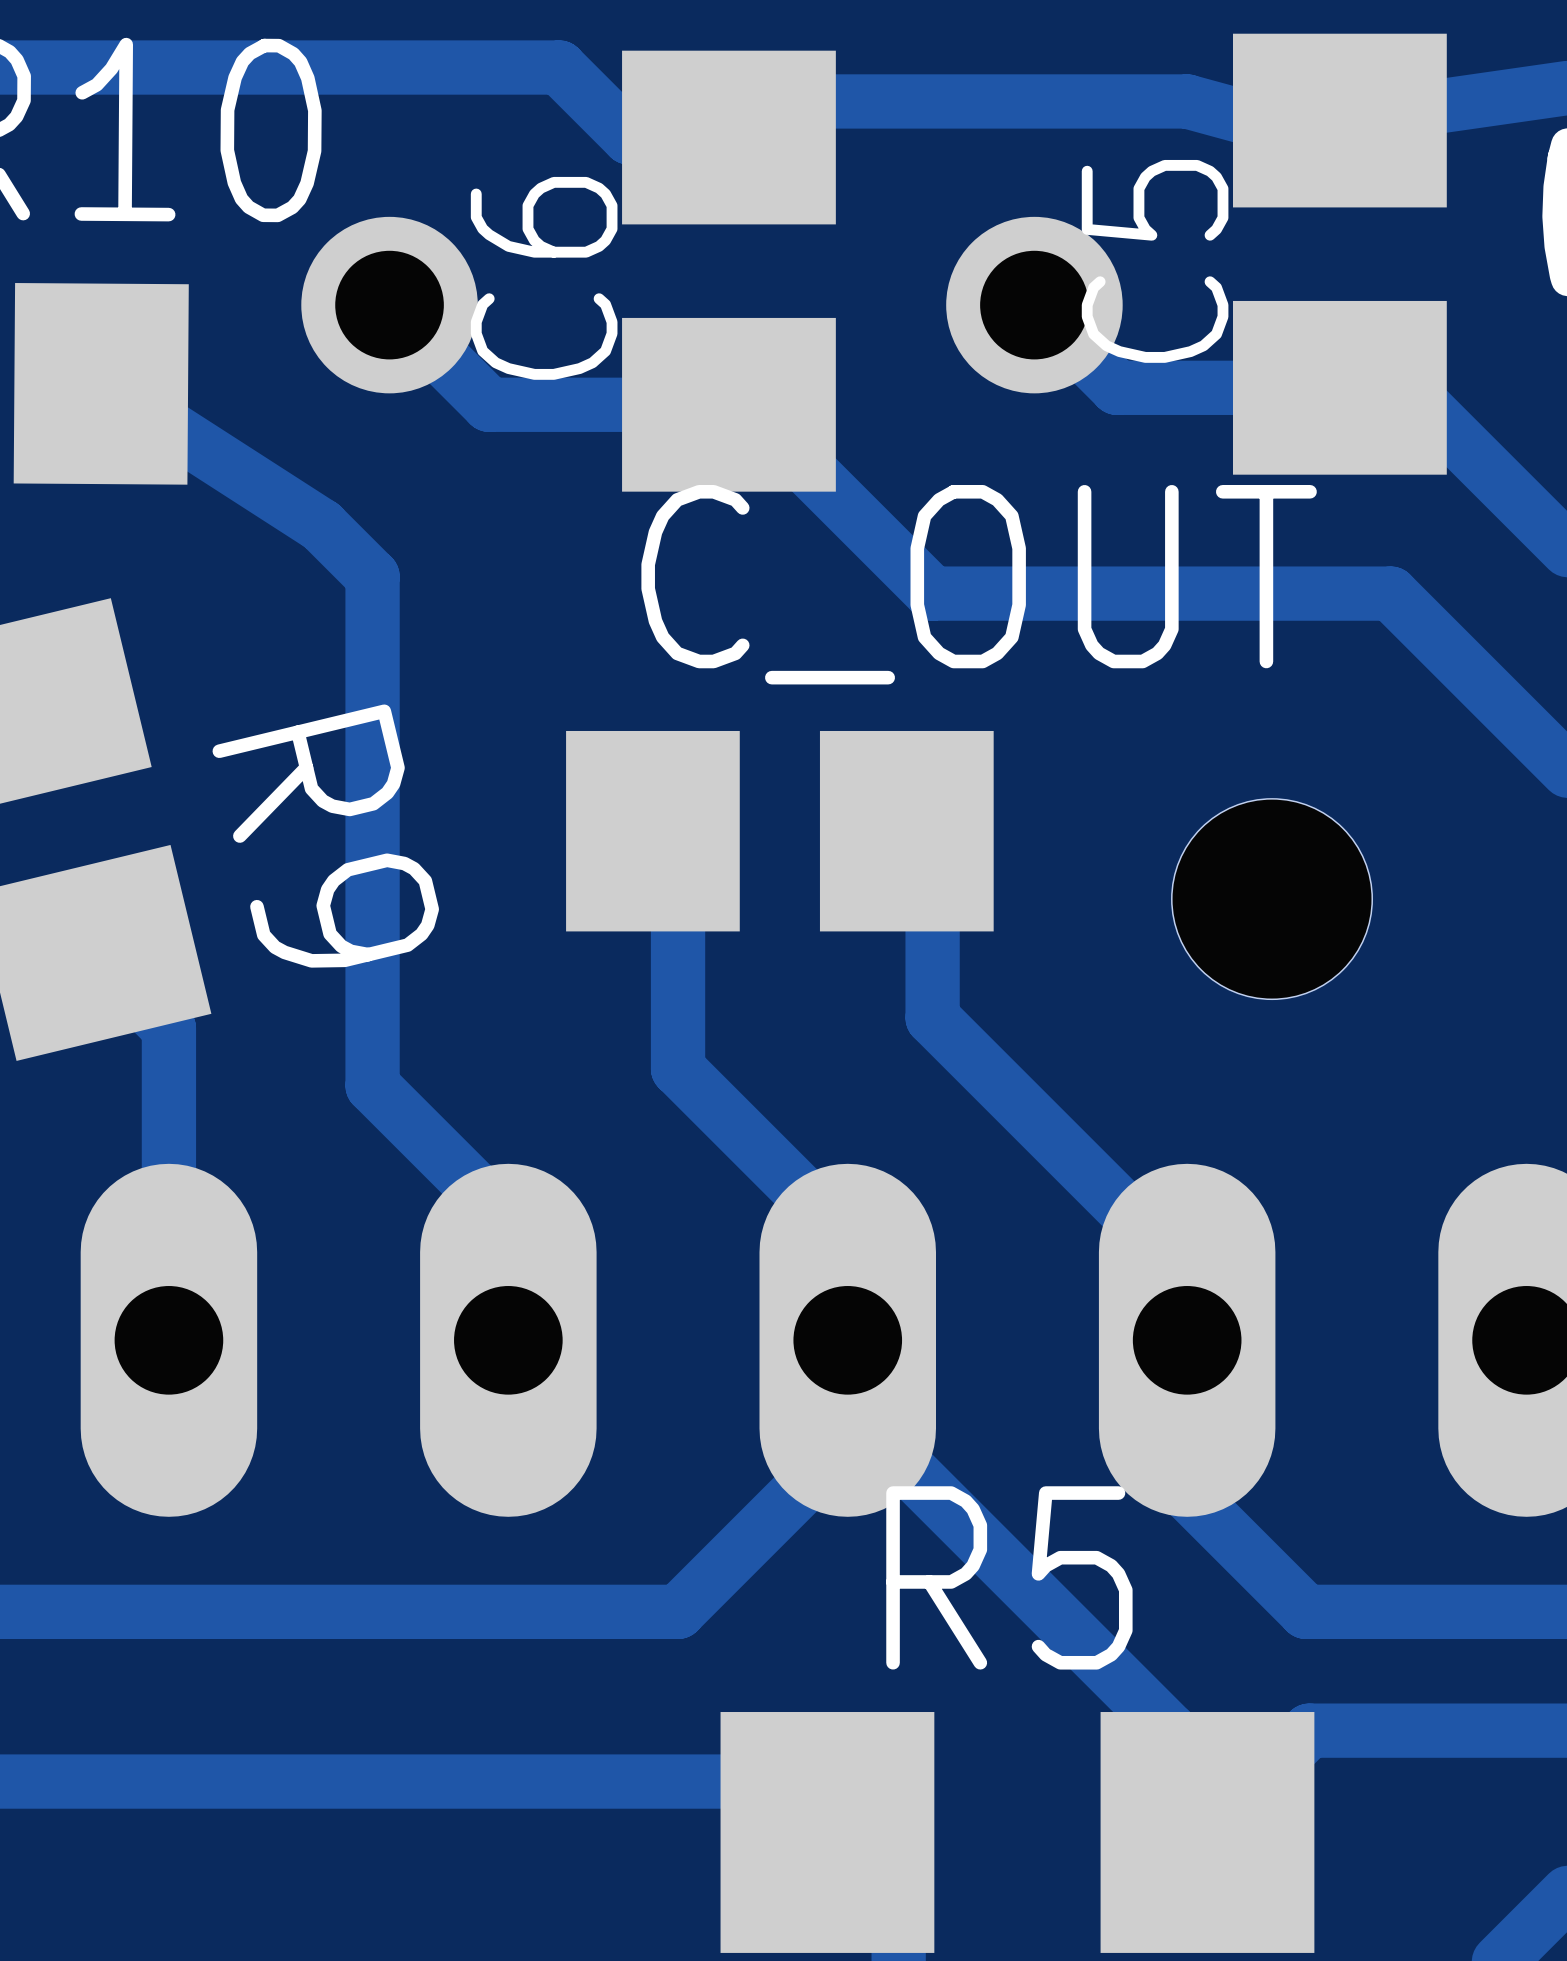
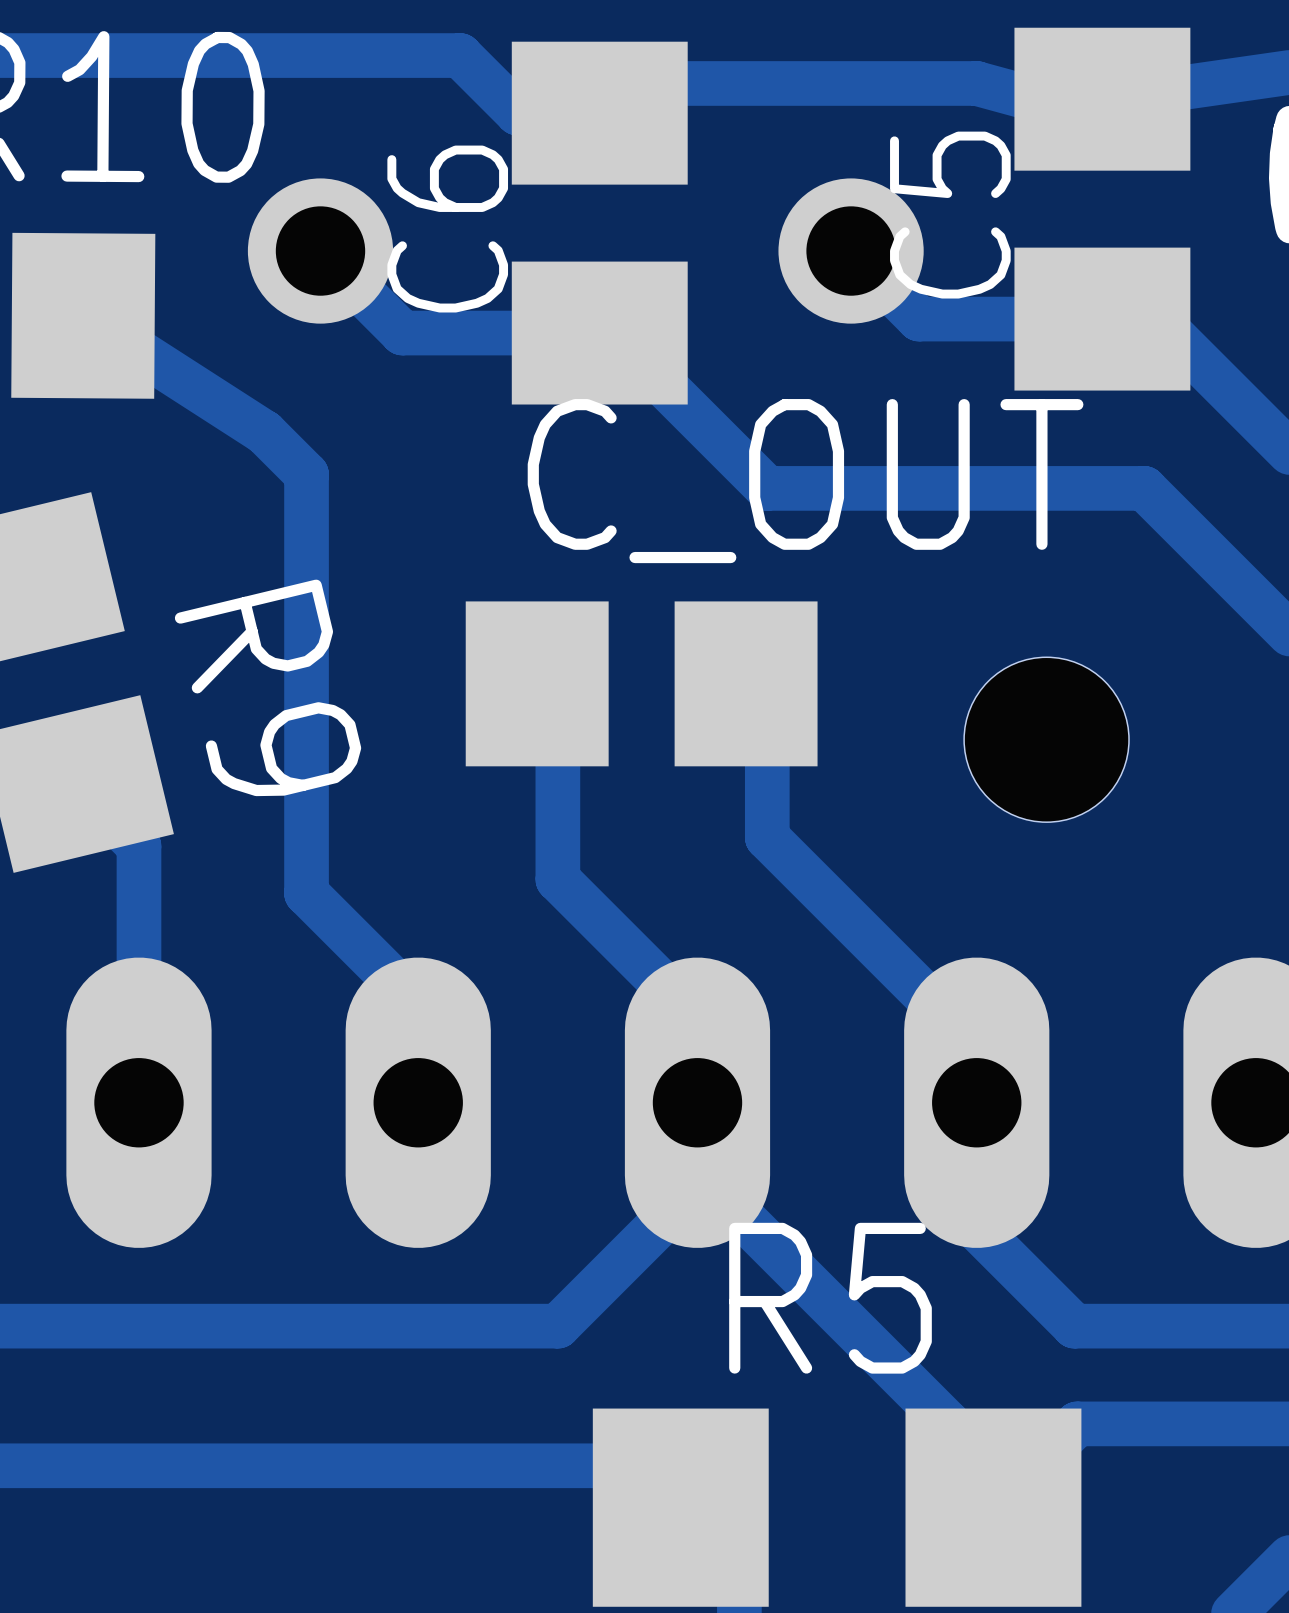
track: (864, 1442) (881, 1442) (1170, 1730) (1170, 1795) -> (711, 1186) (948, 1423) (962, 1476)

